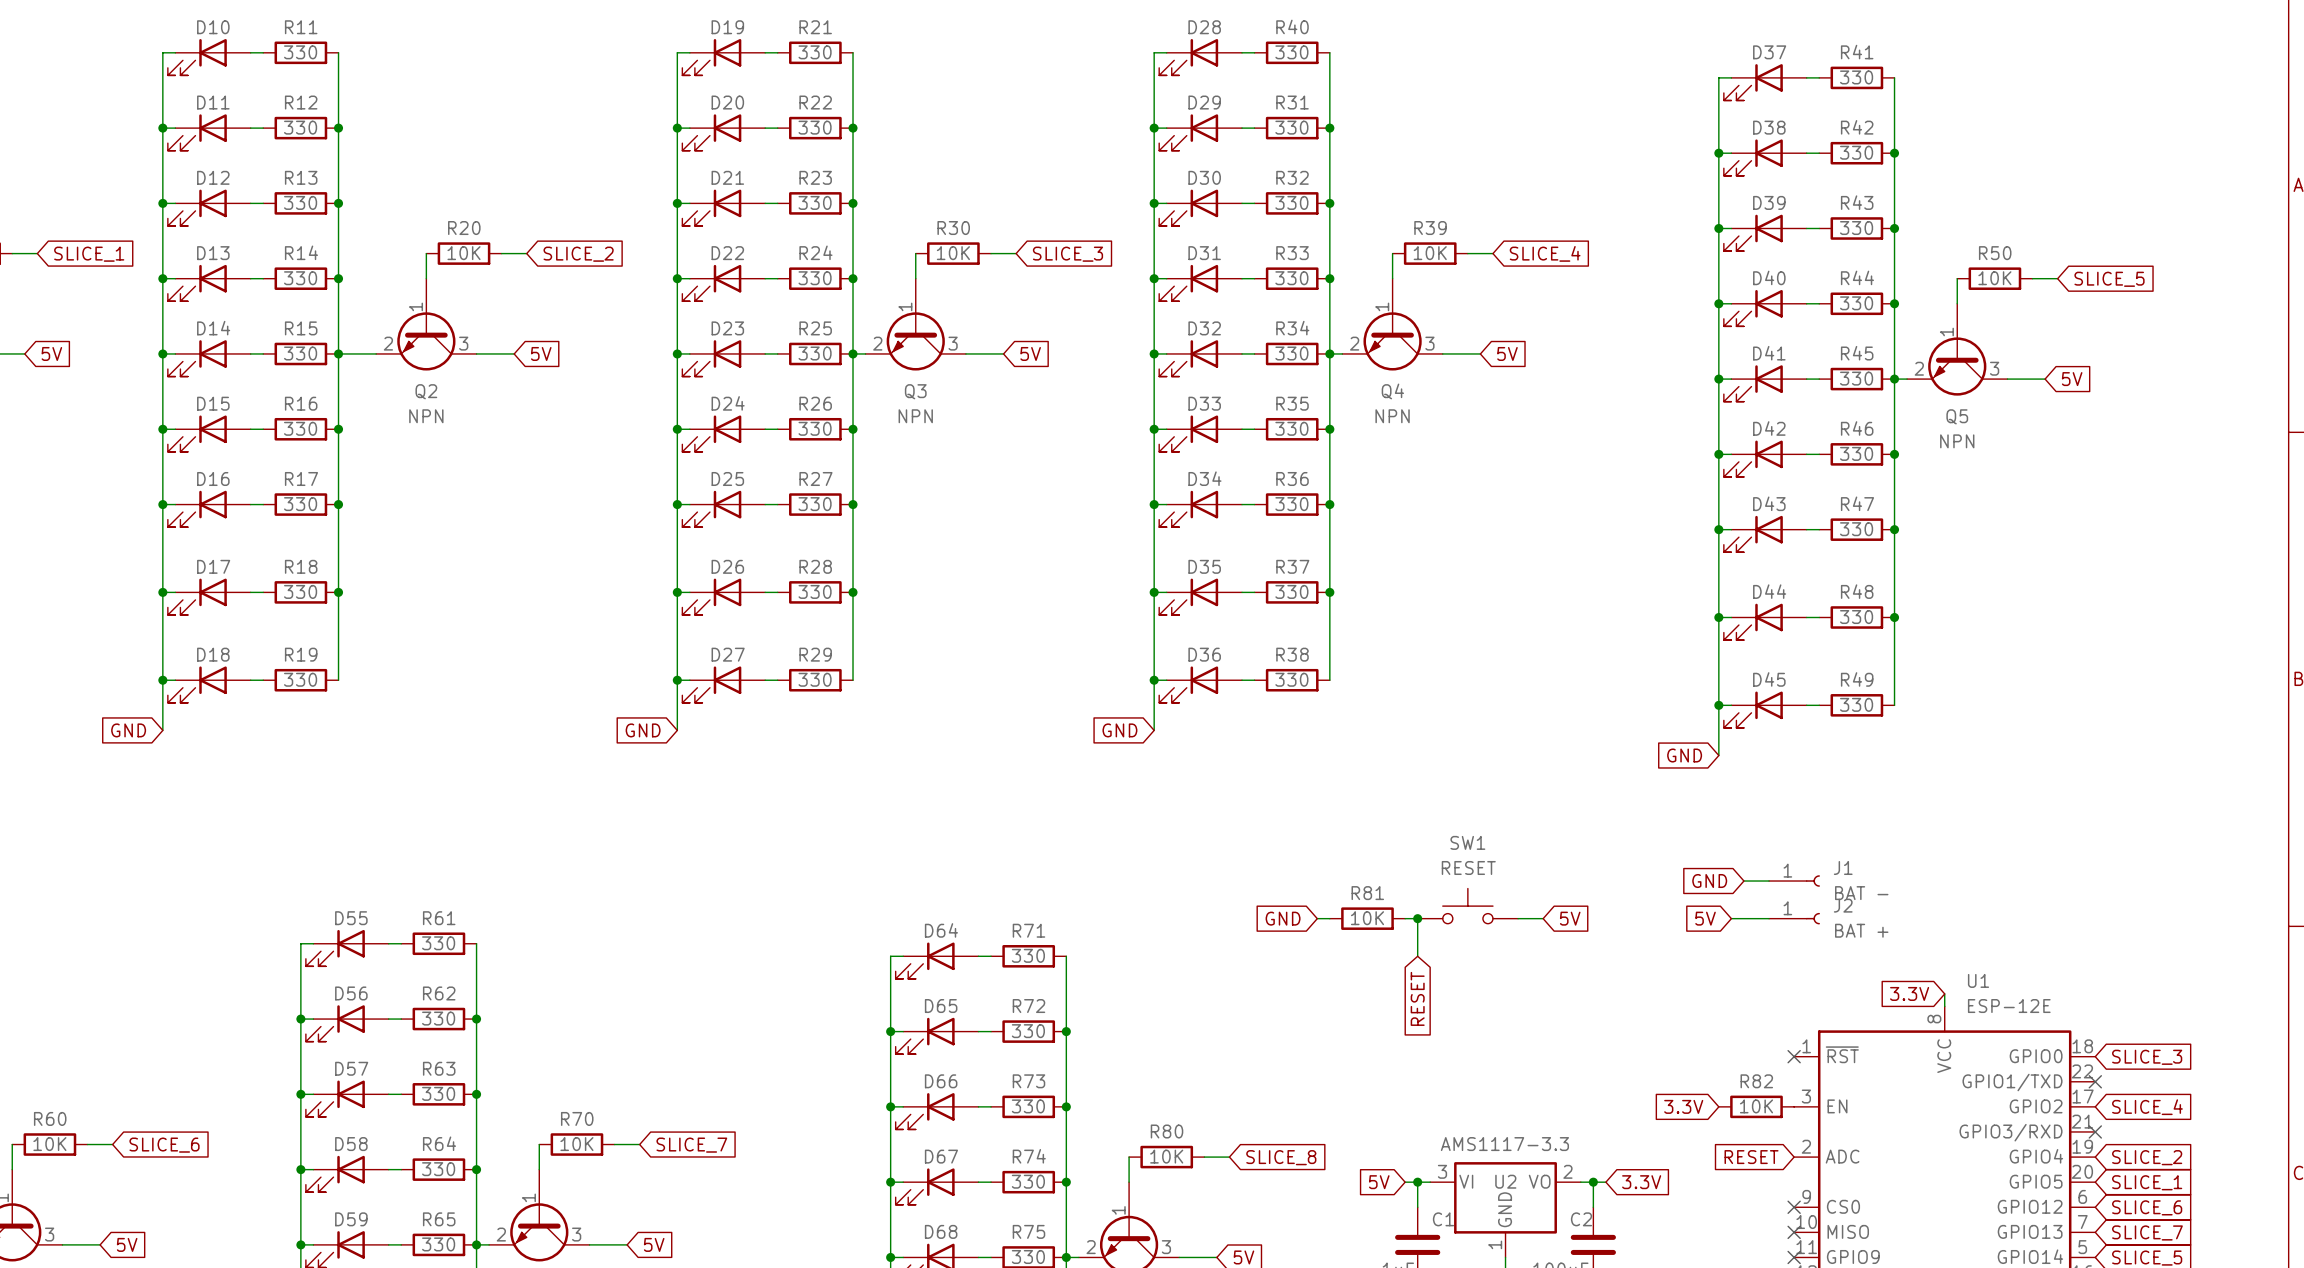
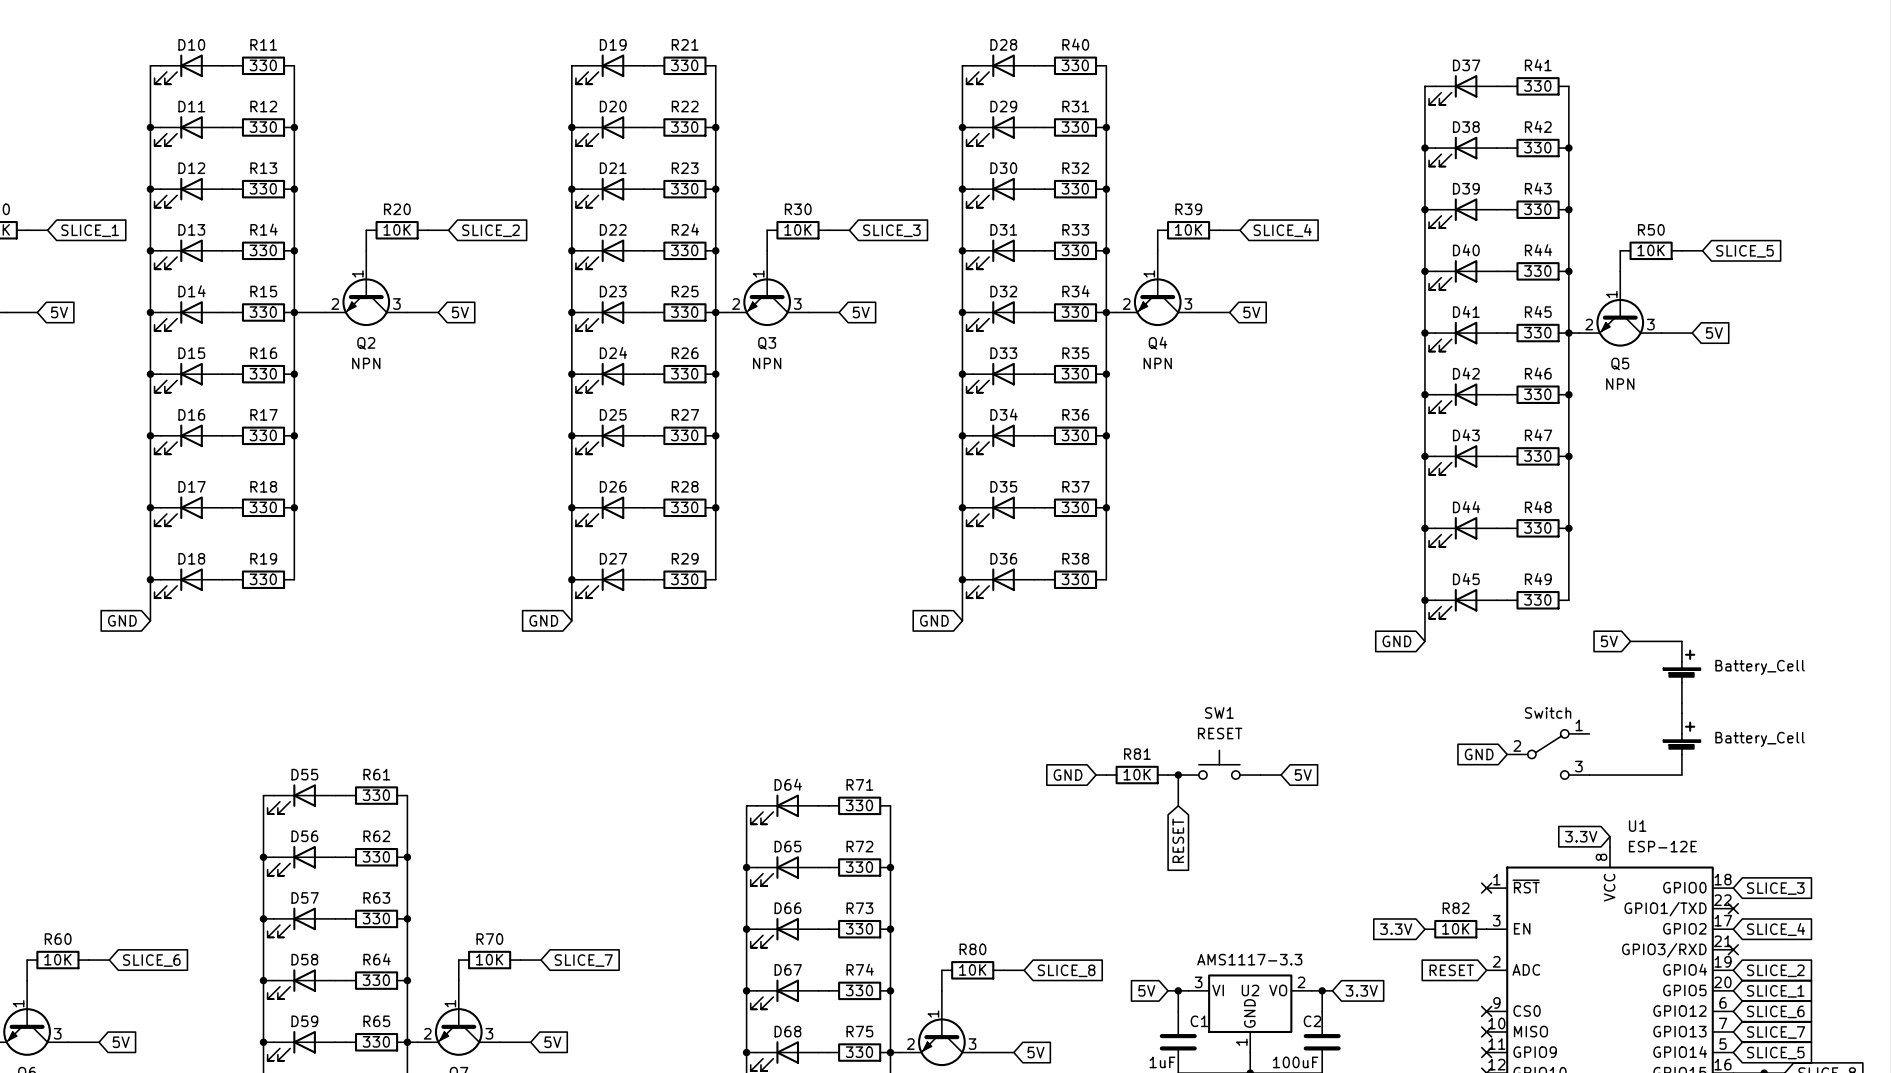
global label: none -> 5V (1609, 641)
wire: none -> (1630, 641) (1681, 641)
part: none -> Battery_Cell (1681, 672)
wire: none -> (1681, 703) (1681, 713)
global label position: GND (1709, 881) -> GND (1479, 754)
wire: (1743, 881) (1769, 881) -> none
J1: BAT - (1794, 881) -> none
part: none -> Battery_Cell (1681, 744)
part: none -> Switch (1548, 754)
global label: 5V (1705, 918) -> none
wire: (1731, 918) (1769, 918) -> none
J2: BAT + (1794, 918) -> none
wire: none -> (1589, 775) (1681, 775)

